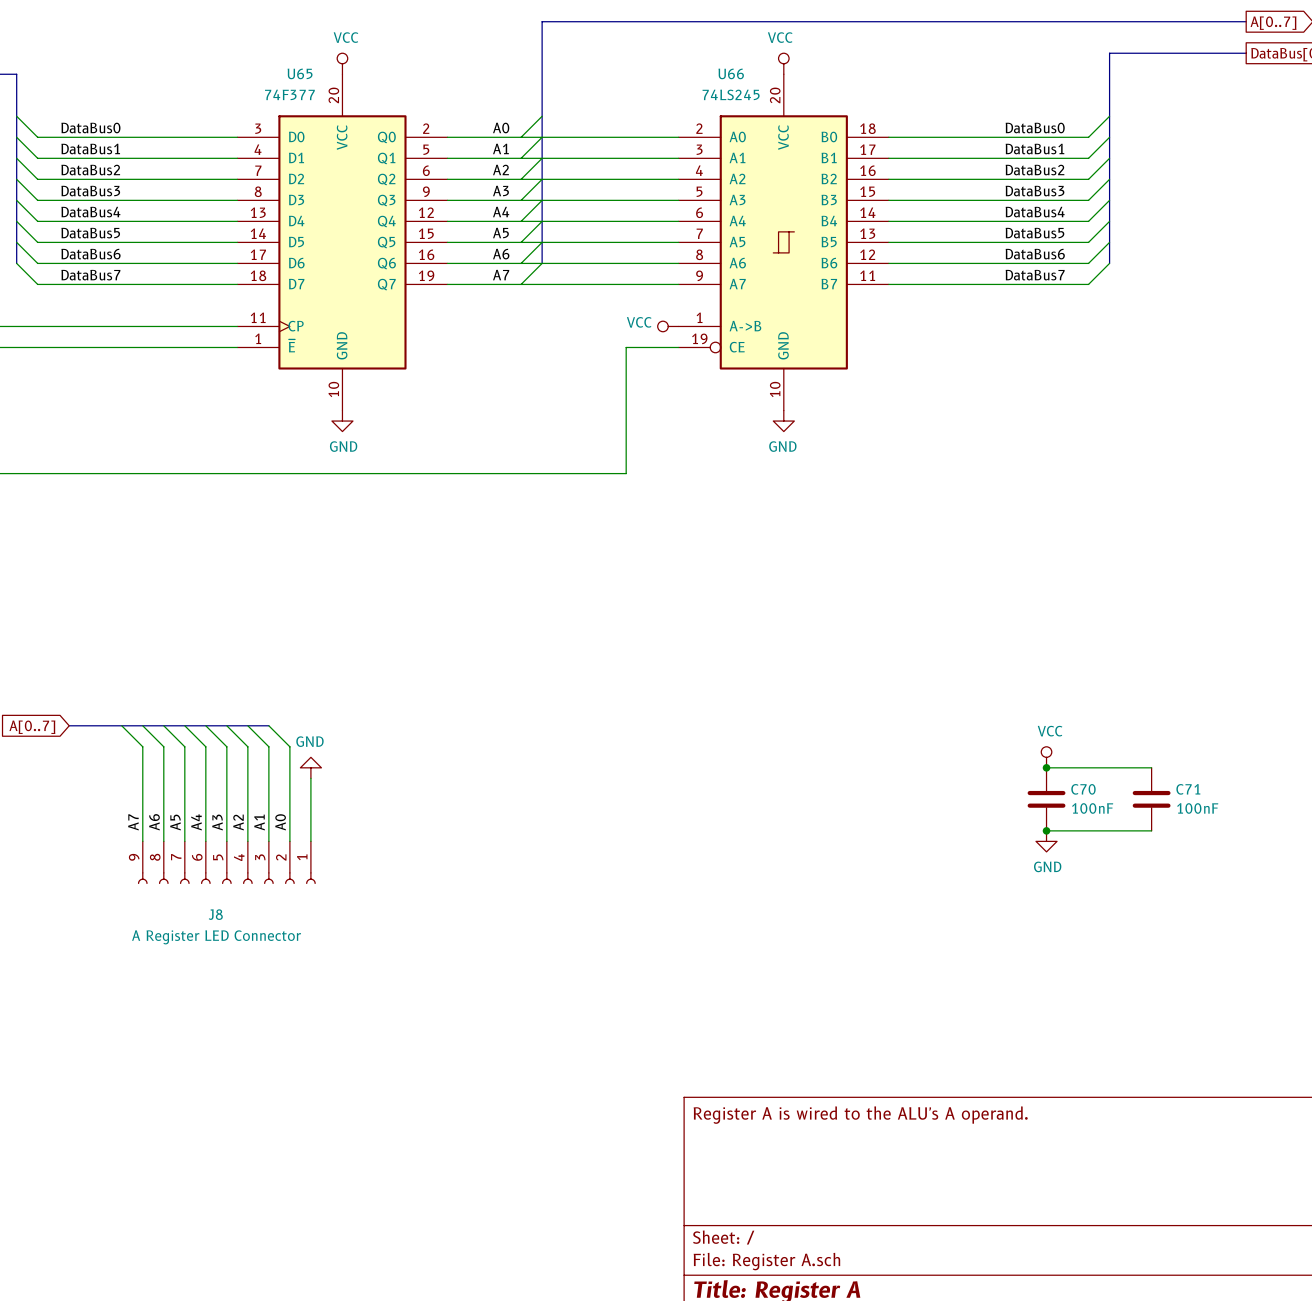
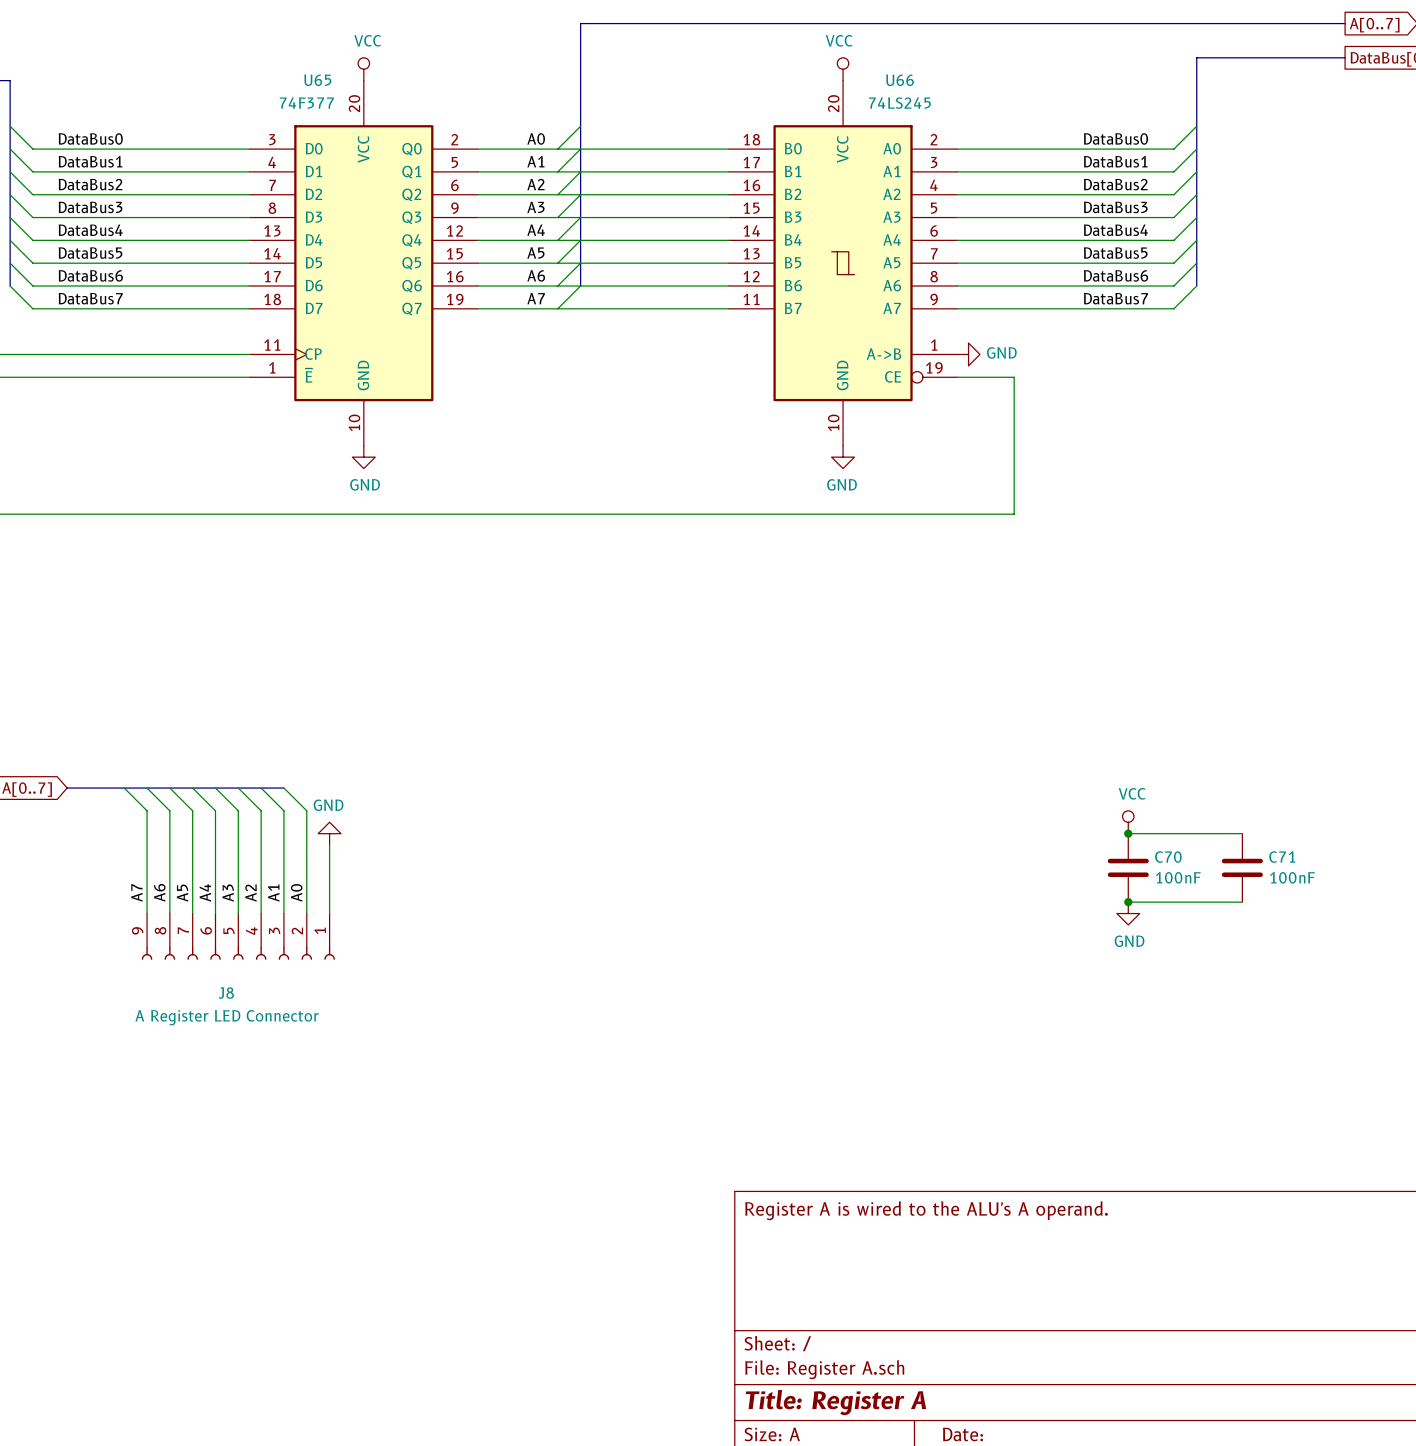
U66 flip: as is (783, 242) -> left-right (843, 263)
power symbol: VCC (668, 326) -> none
power symbol: none -> GND (968, 354)
wire: (678, 347) (626, 347) (626, 473) -> (957, 377) (1014, 377) (1014, 514) (671, 514)

